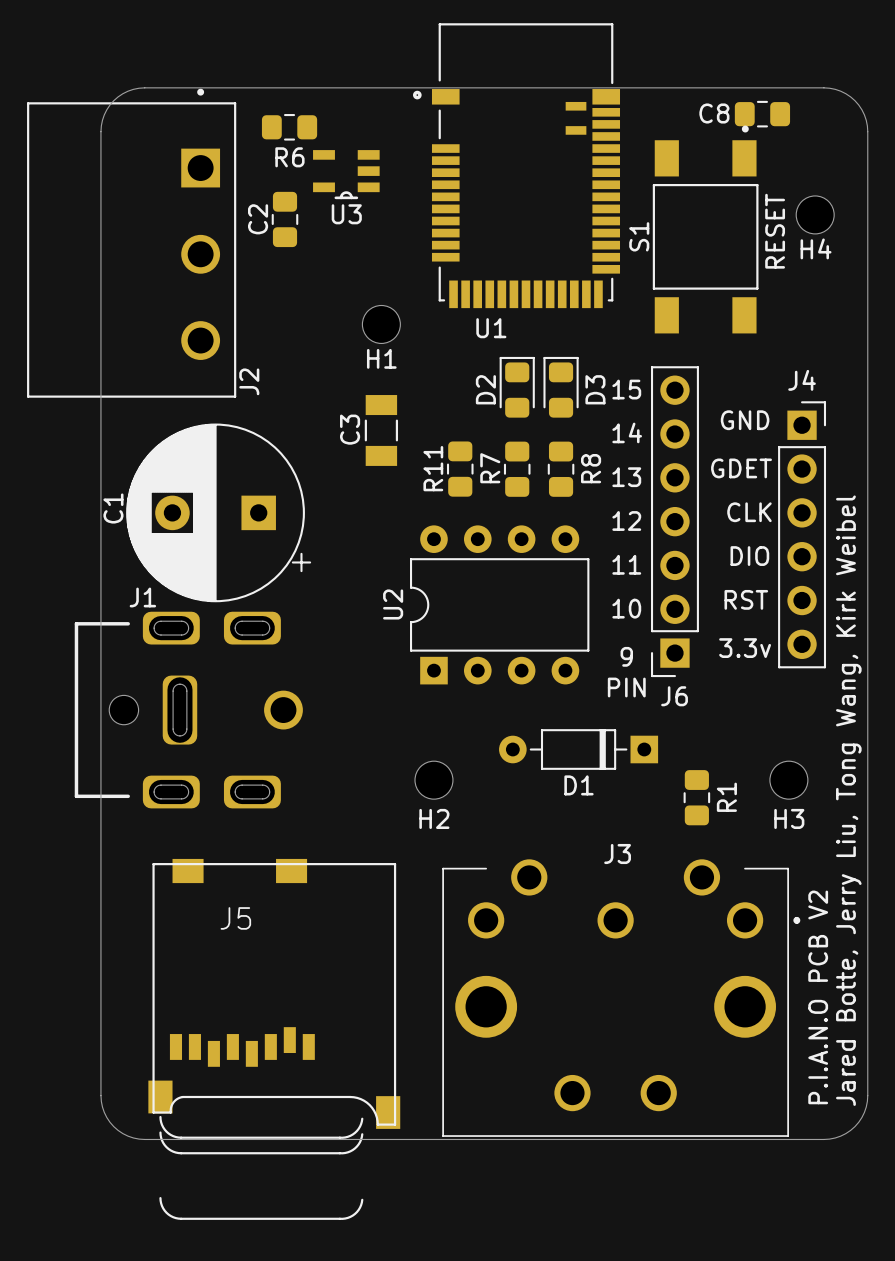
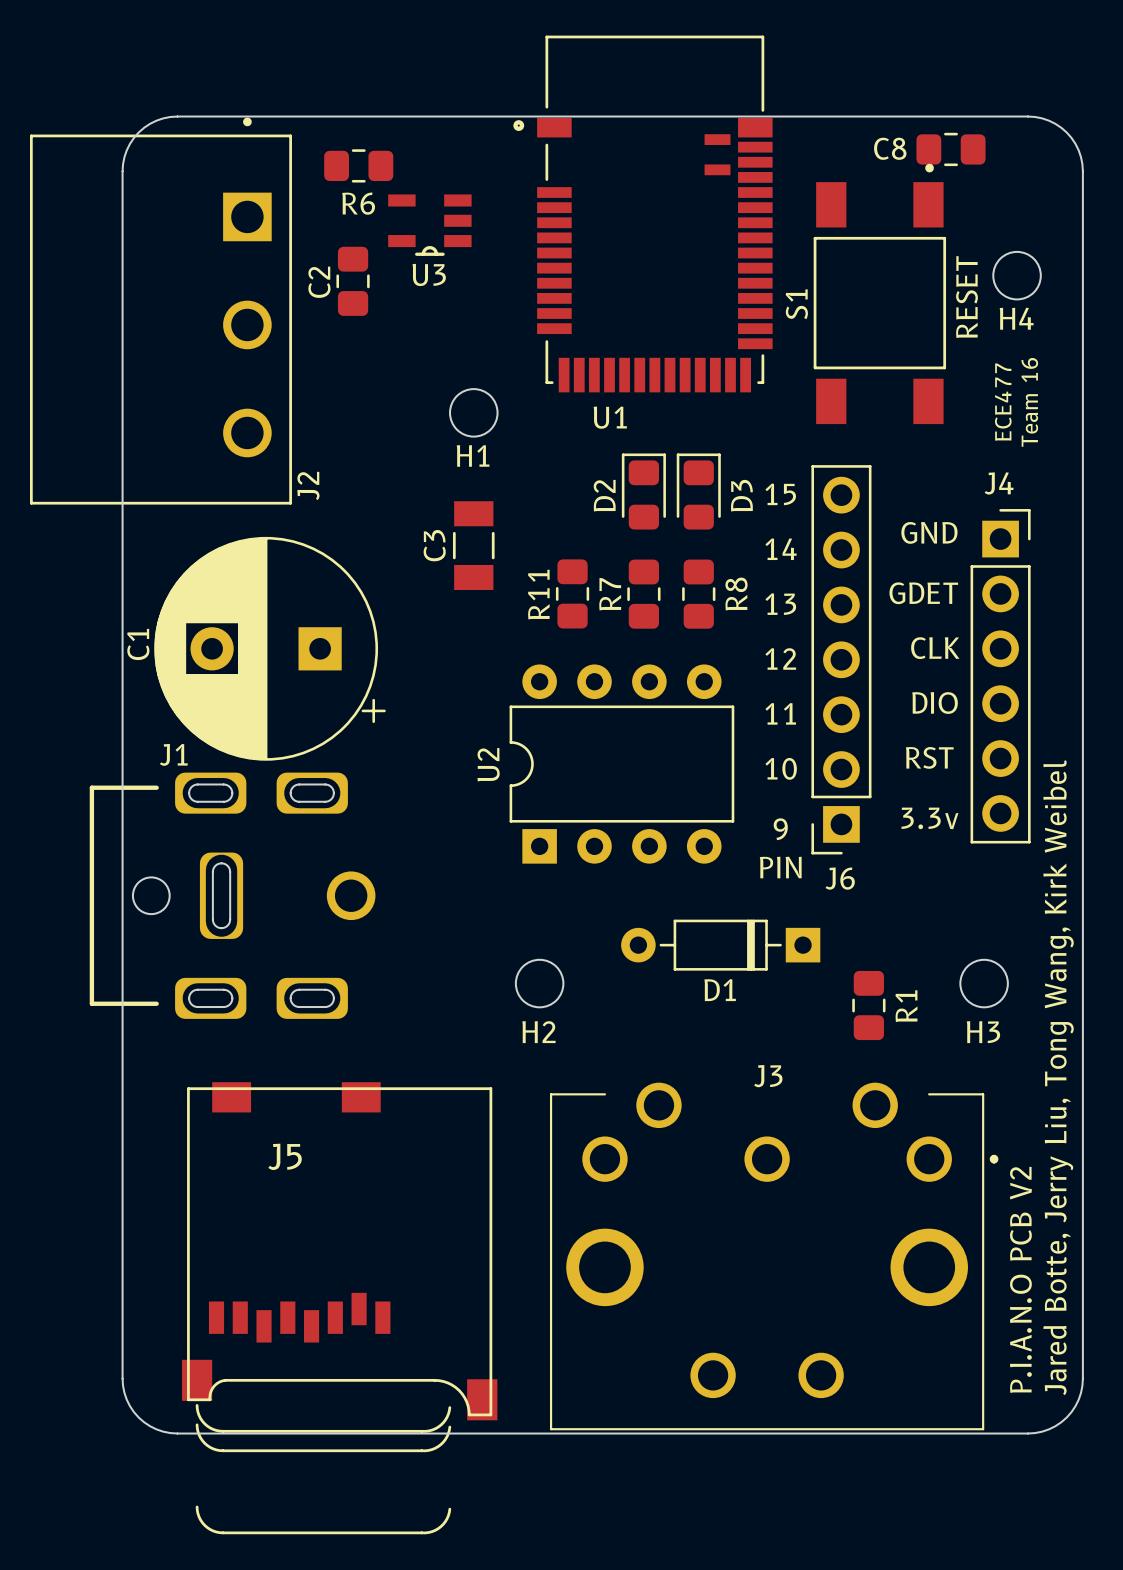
text: none -> ECE477 (1003, 402)
text: none -> Team 16 (1029, 402)

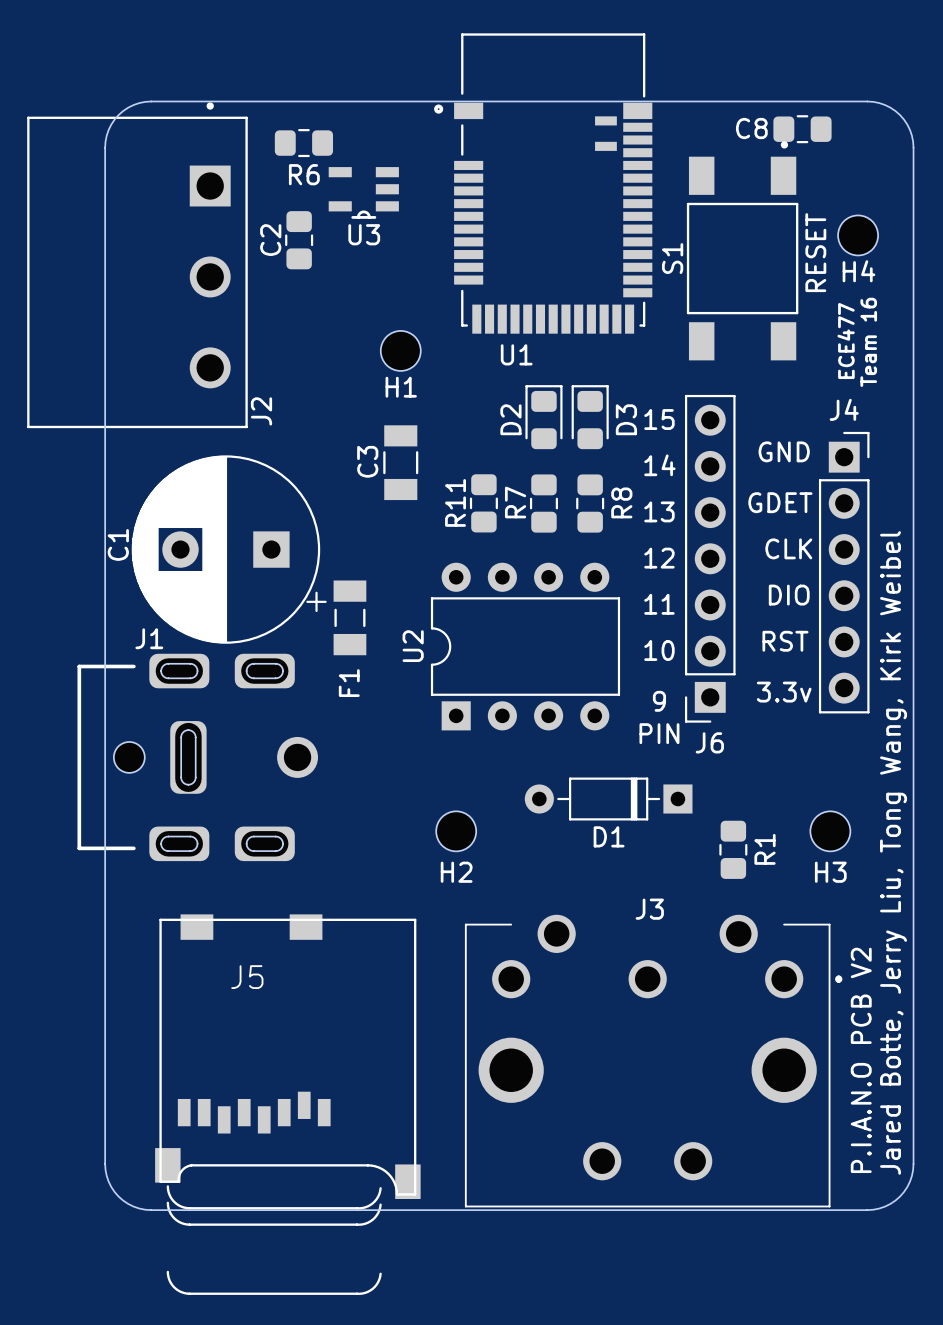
F1: none -> (349, 617)

